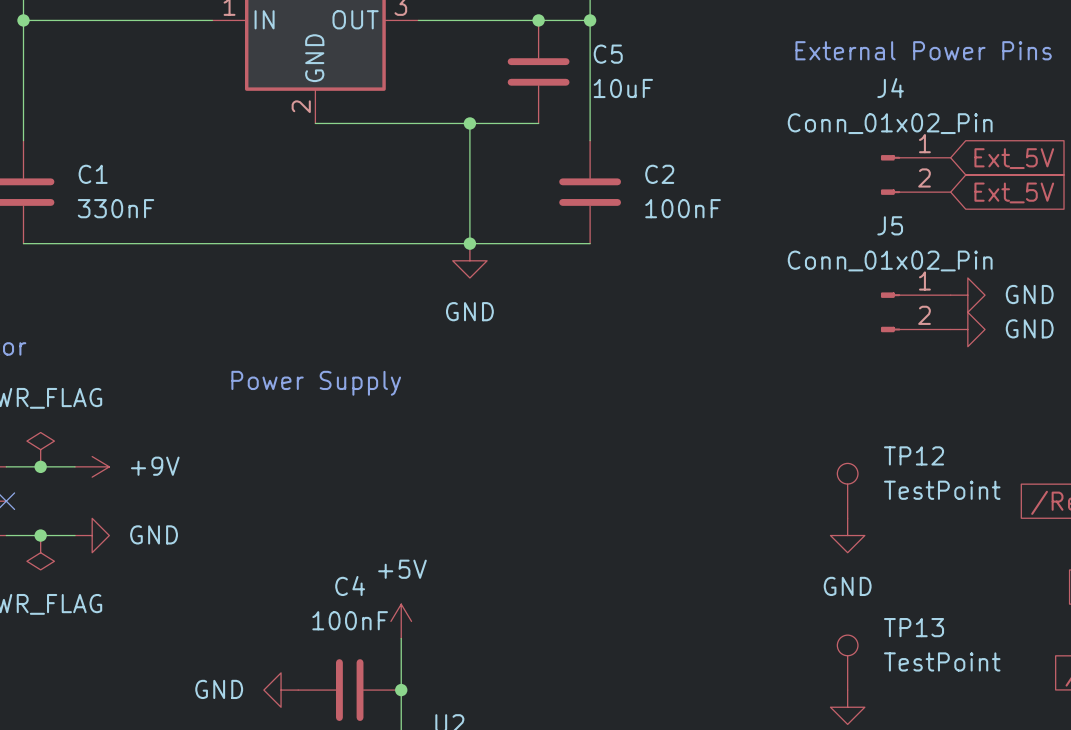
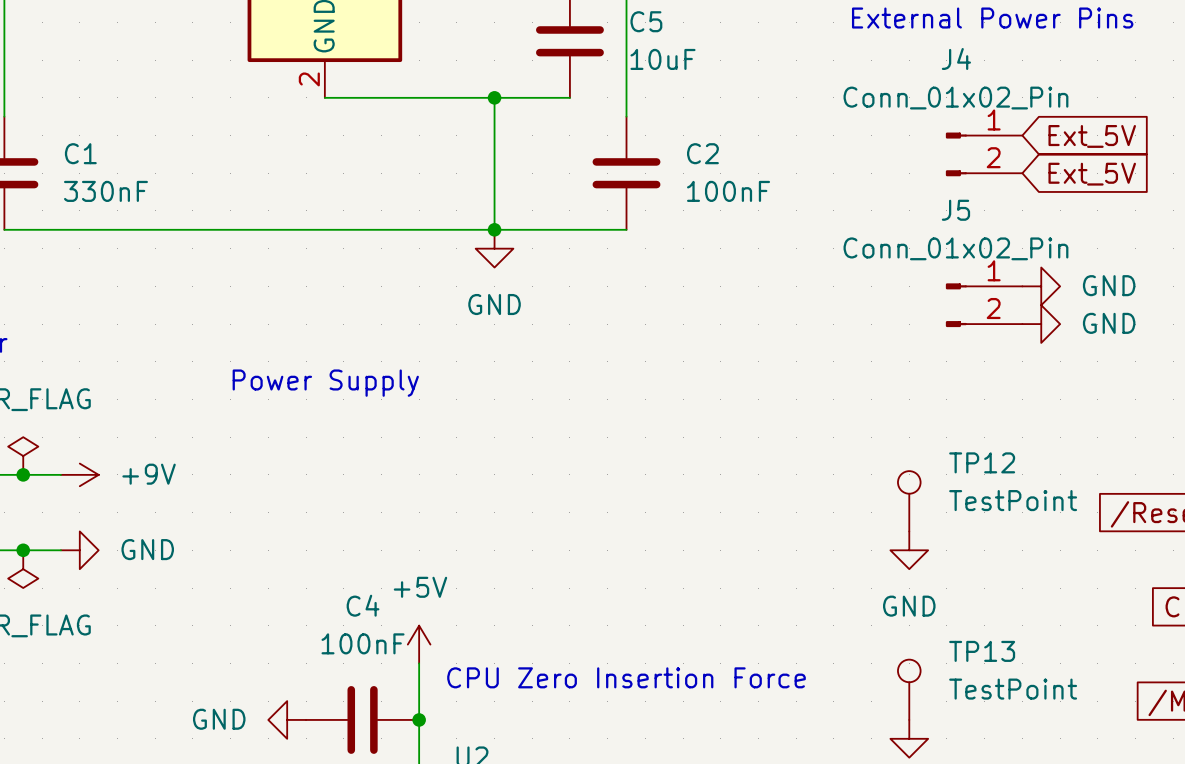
text: none -> CPU Zero Insertion Force (626, 677)

